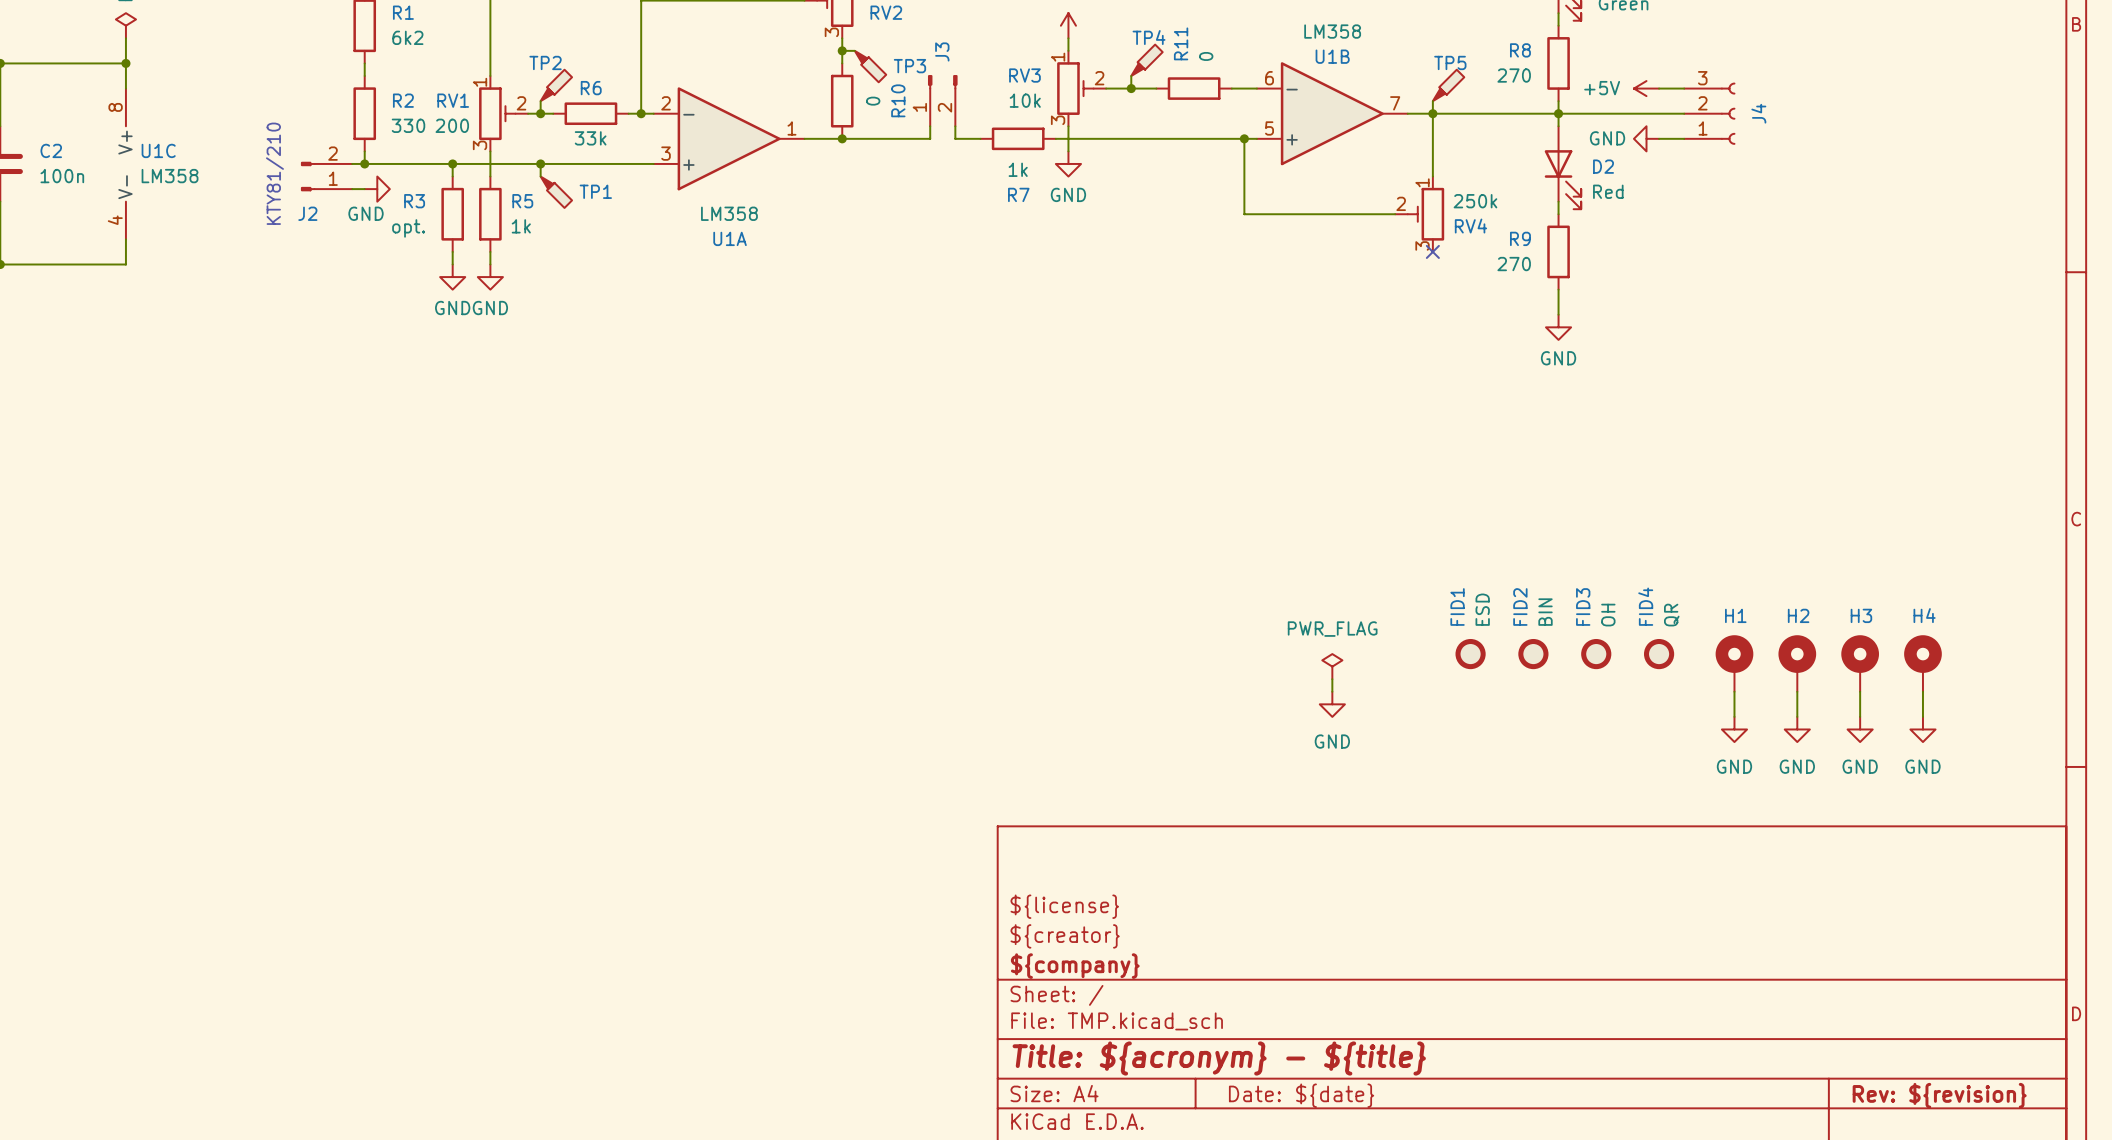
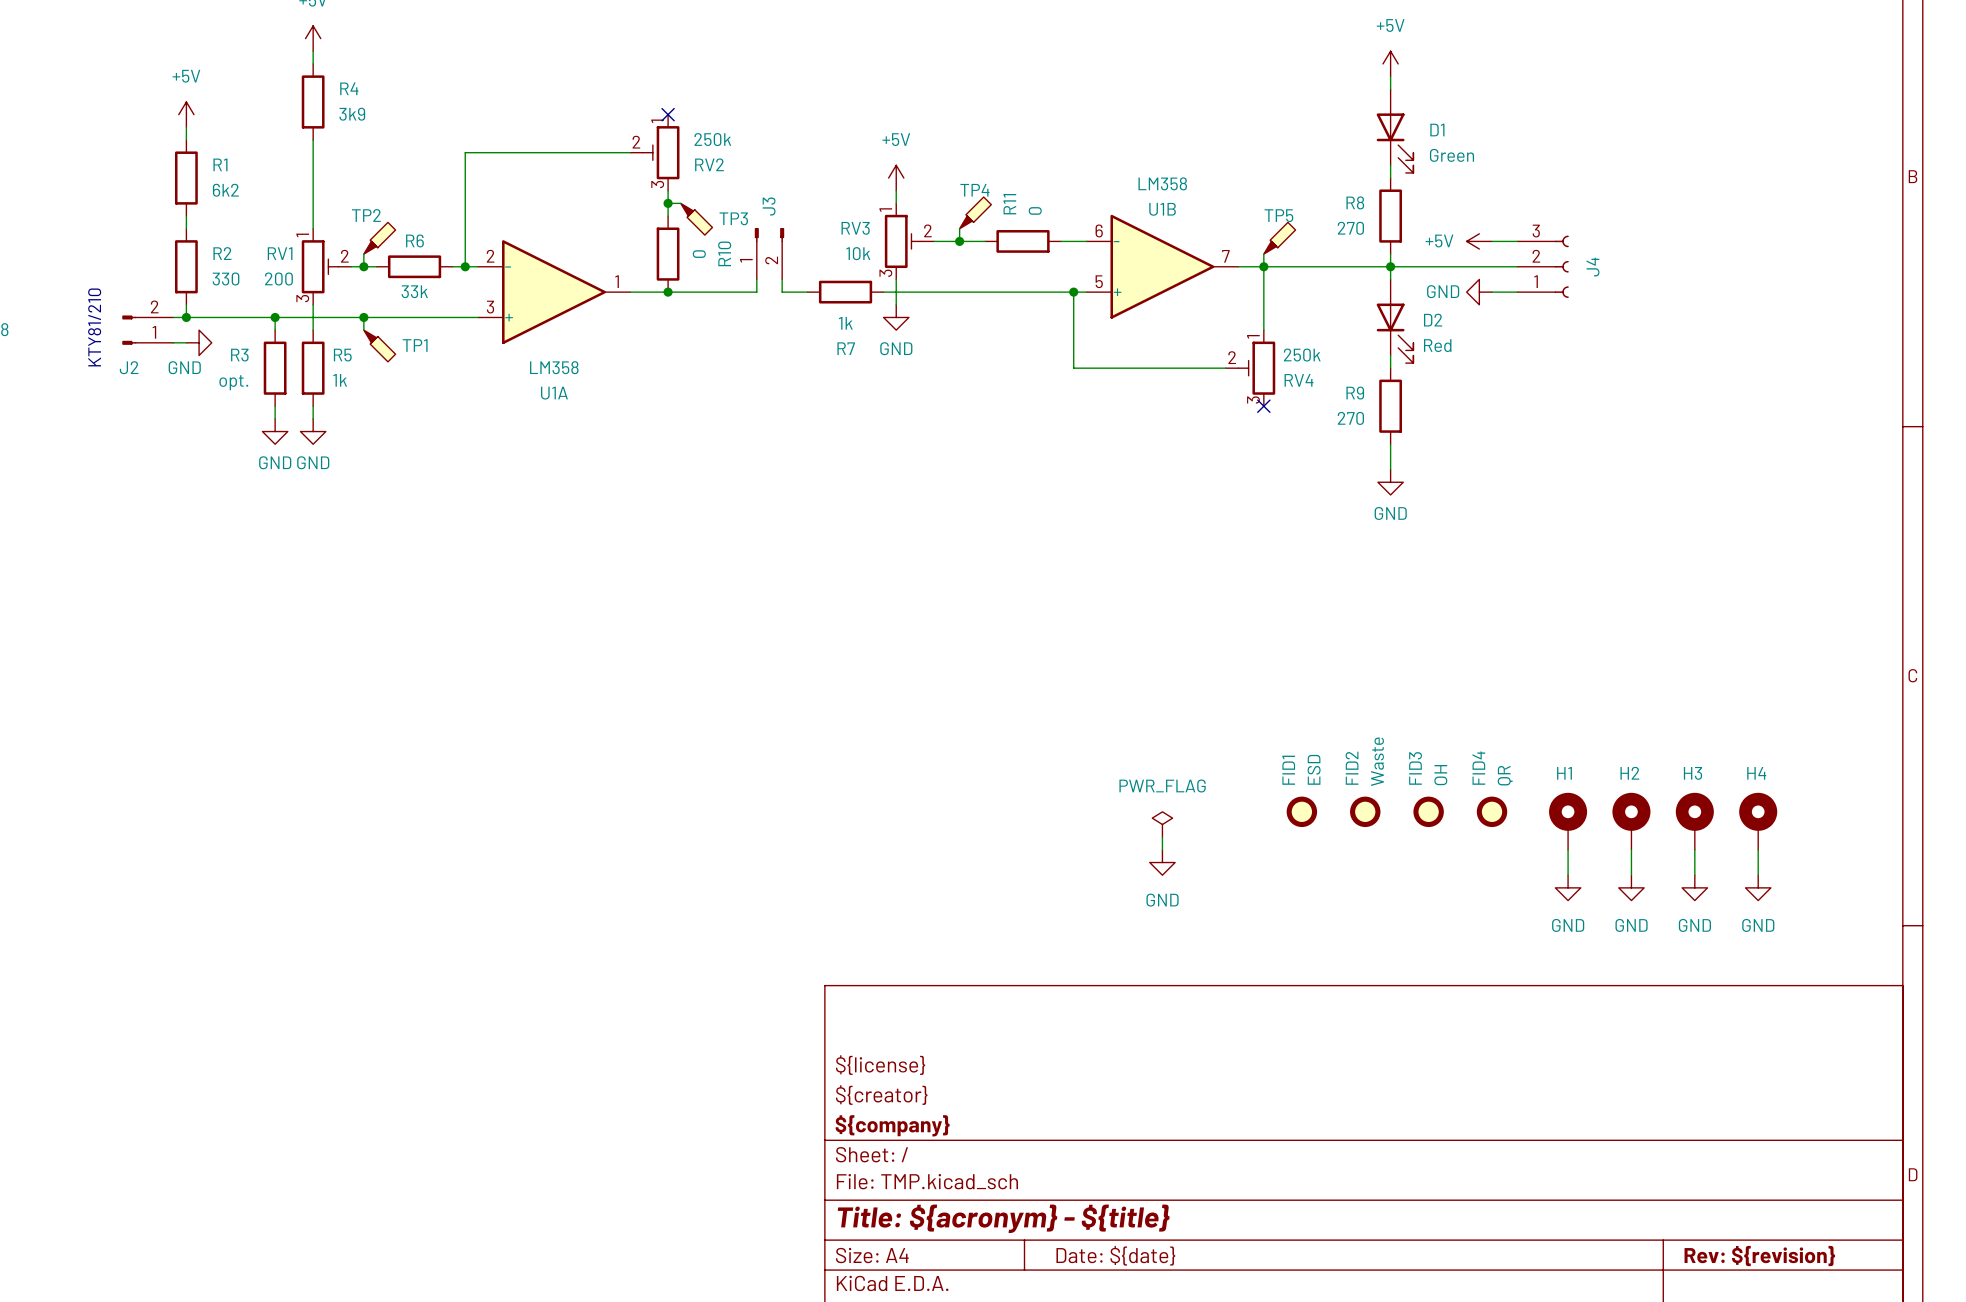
FID2 value: BIN (1545, 612) -> Waste (1377, 761)

